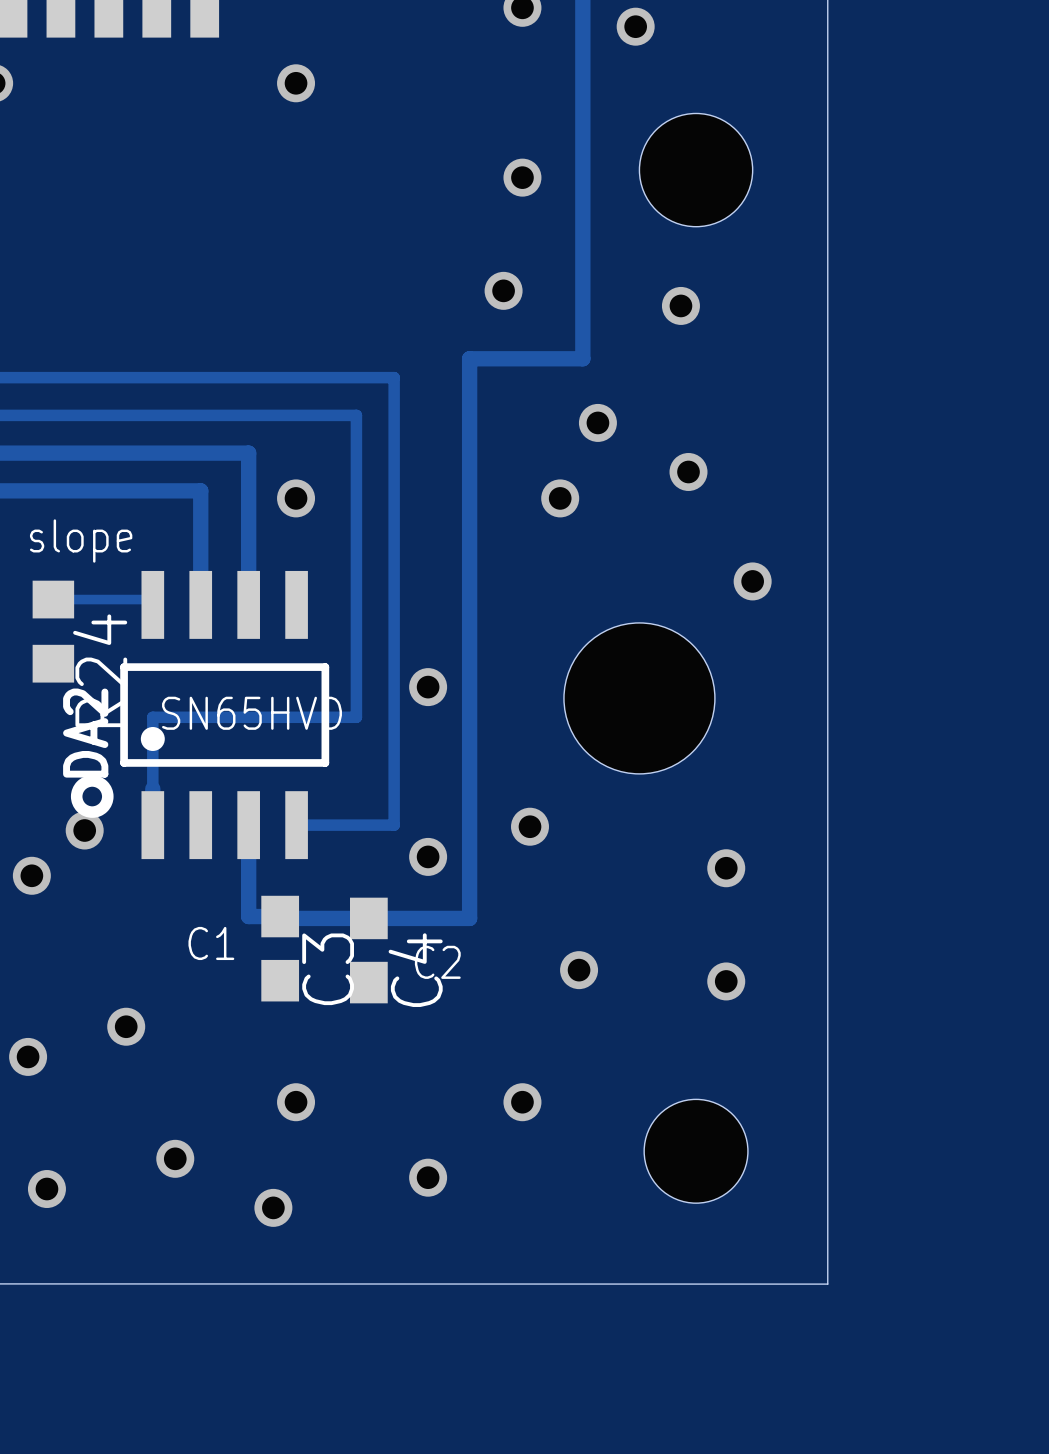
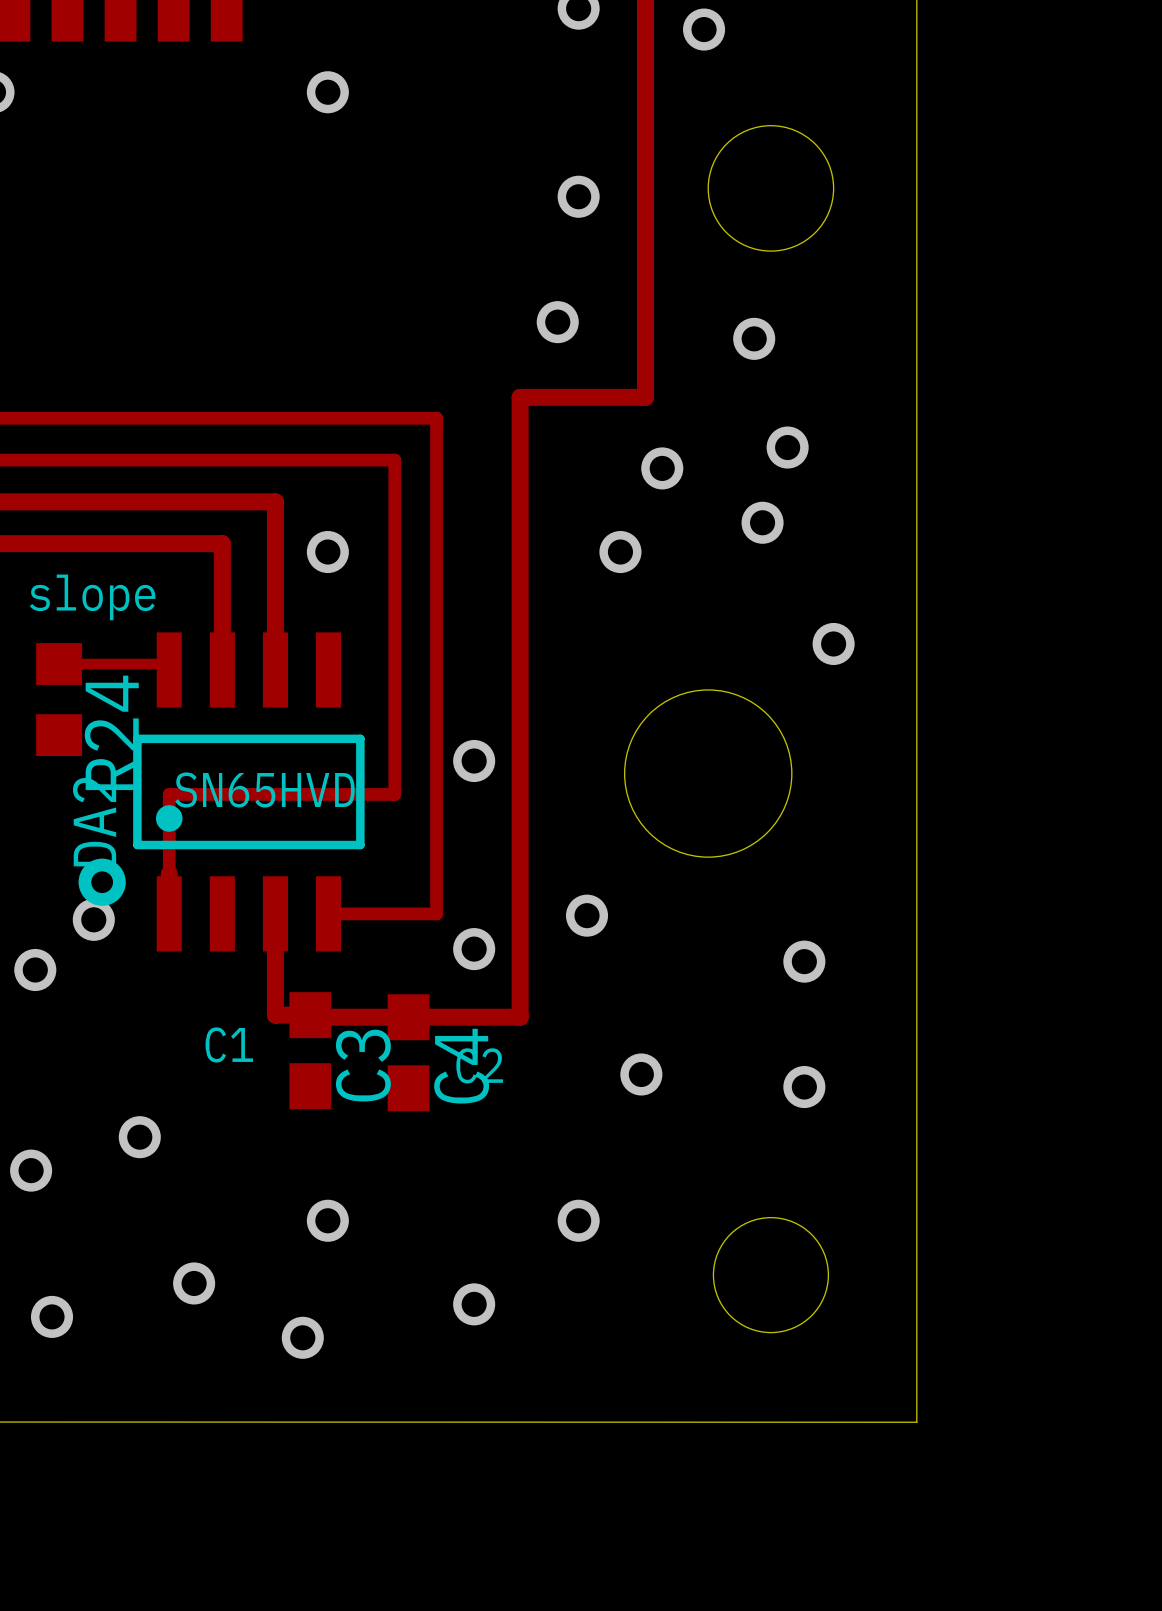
via: none -> (787, 447)

